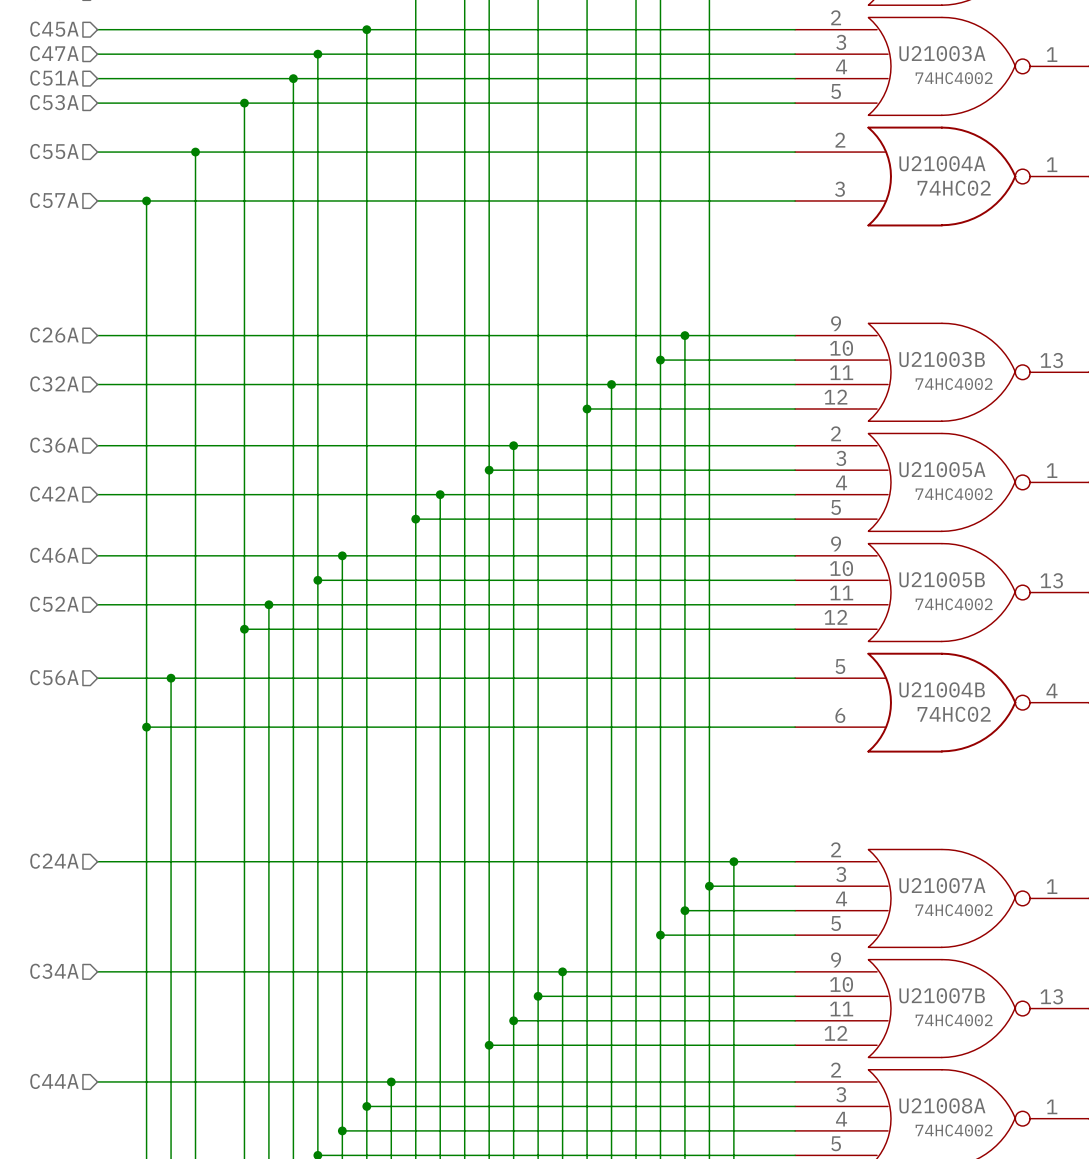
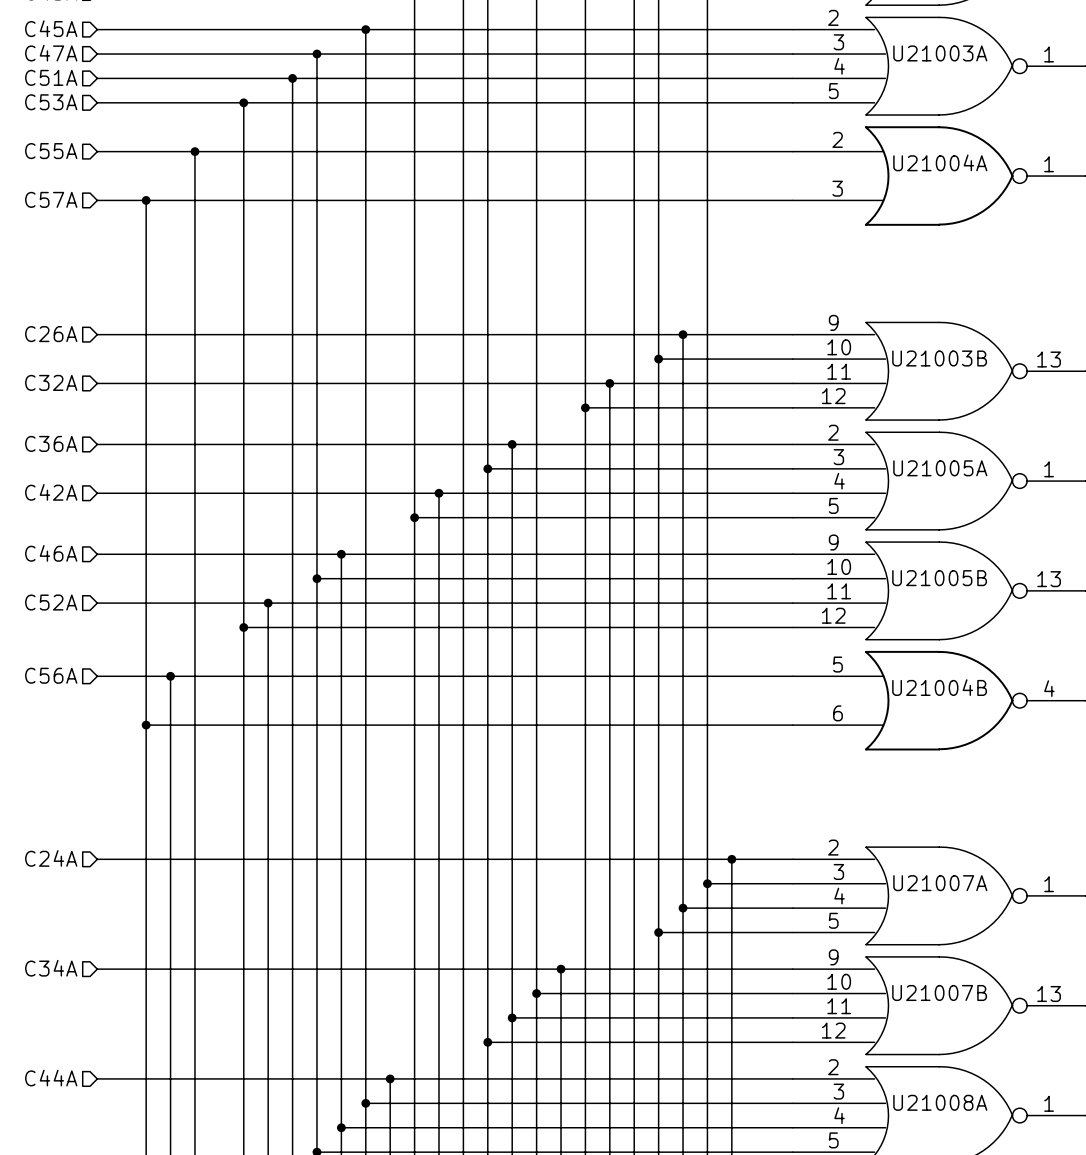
U21003A value: 74HC4002 (954, 78) -> none
U21004A value: 74HC02 (954, 188) -> none
U21003B value: 74HC4002 (954, 384) -> none
U21005A value: 74HC4002 (954, 494) -> none
U21005B value: 74HC4002 (954, 604) -> none
U21004B value: 74HC02 (954, 714) -> none
U21007A value: 74HC4002 (954, 910) -> none
U21007B value: 74HC4002 (954, 1020) -> none
U21008A value: 74HC4002 (954, 1130) -> none

